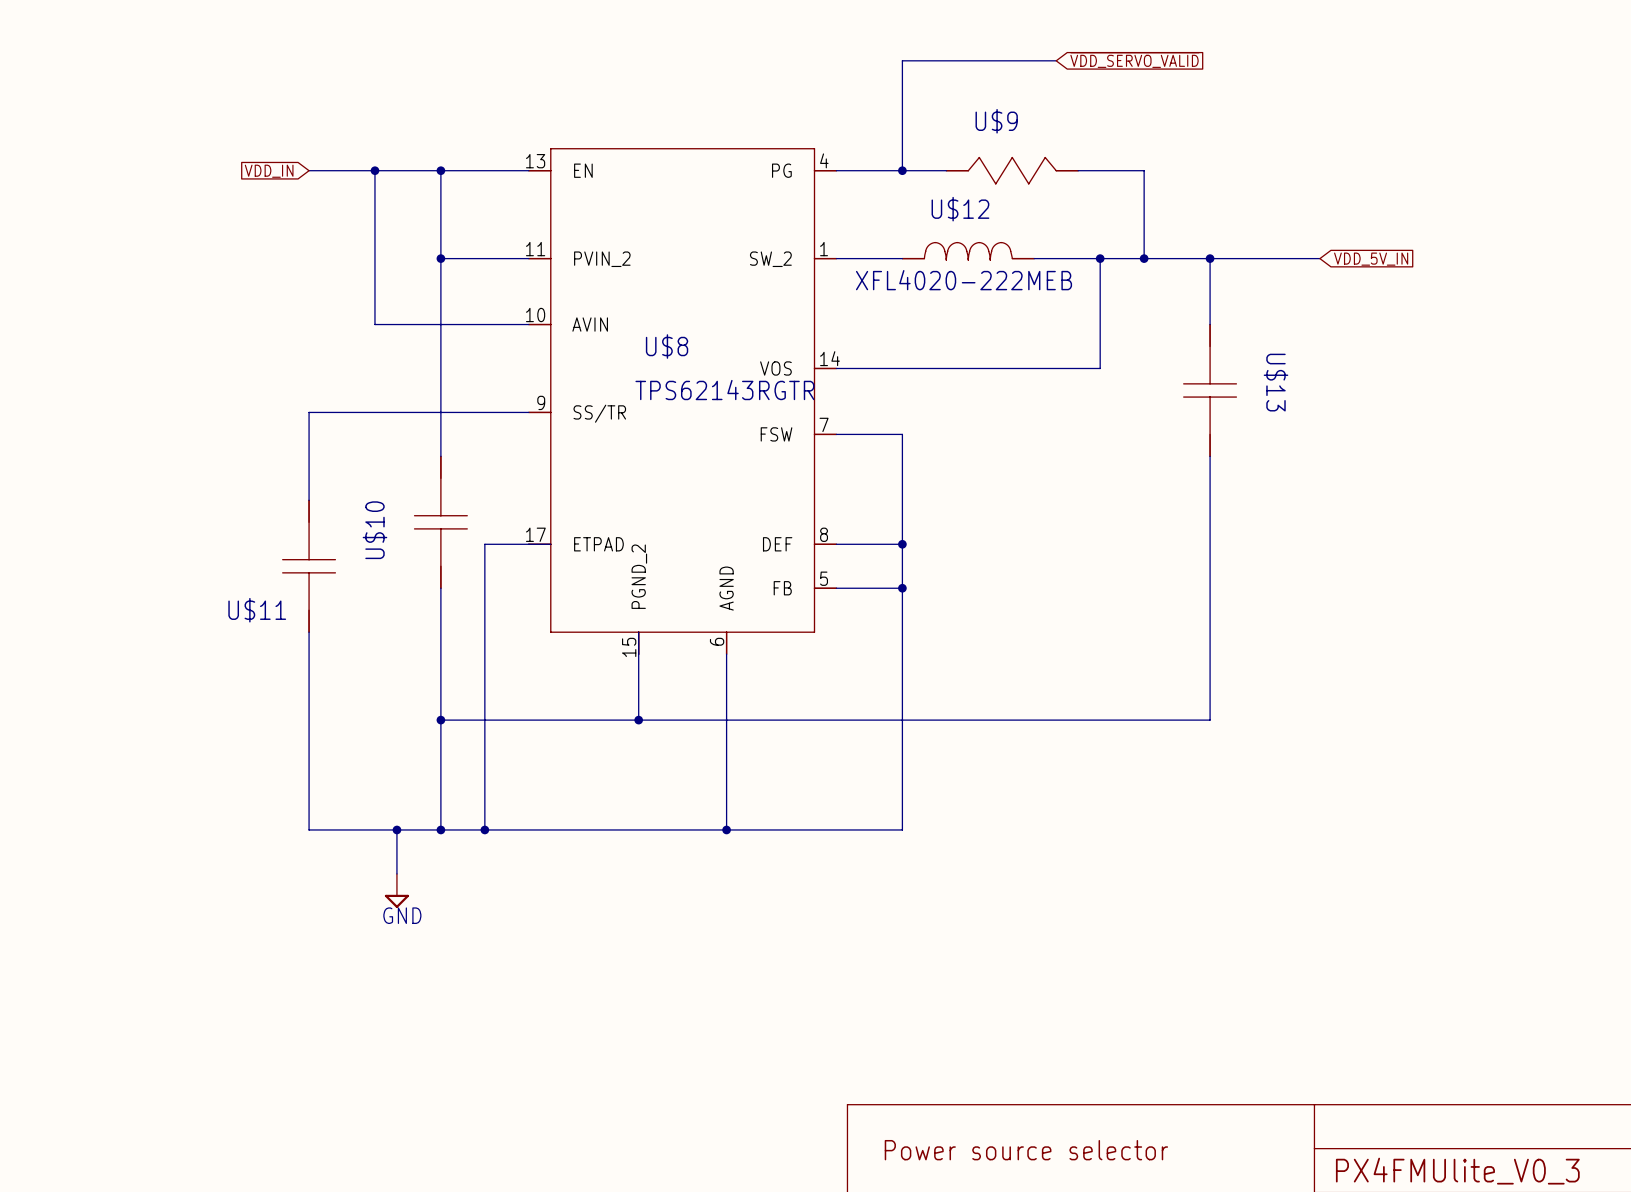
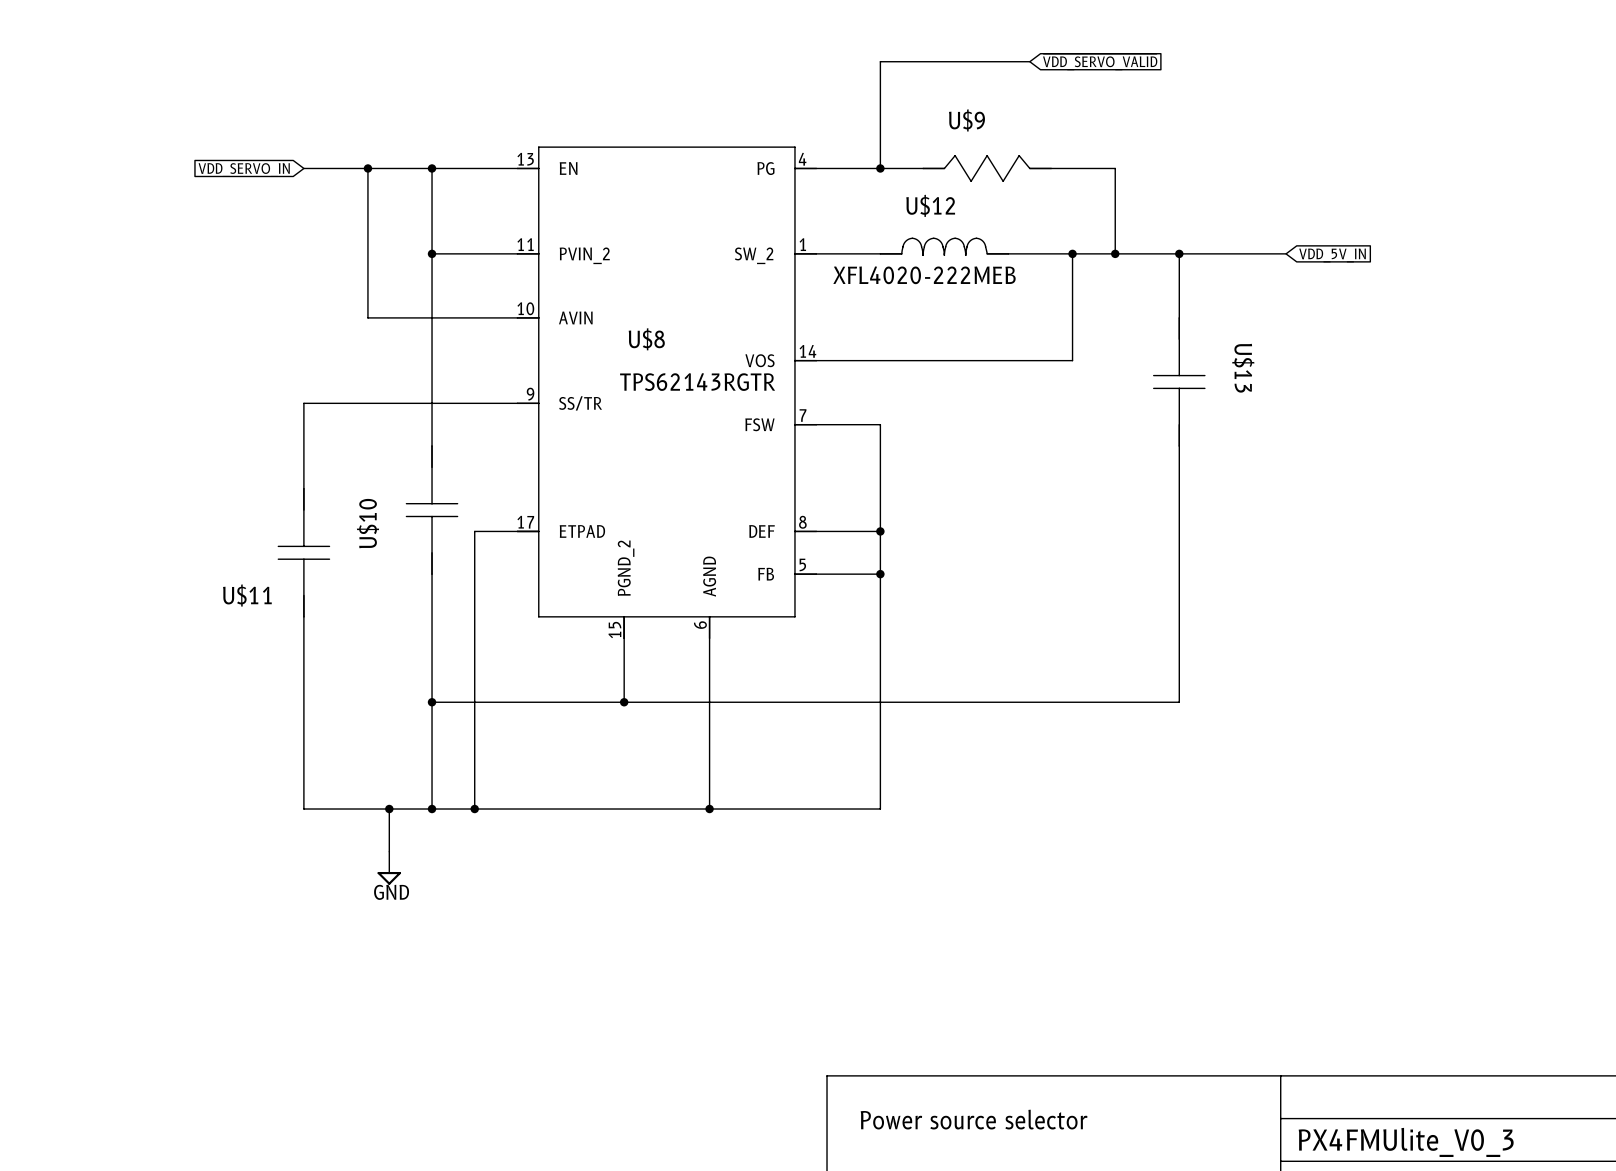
global label: VDD_IN (269, 171) -> VDD_SERVO_IN (244, 170)

